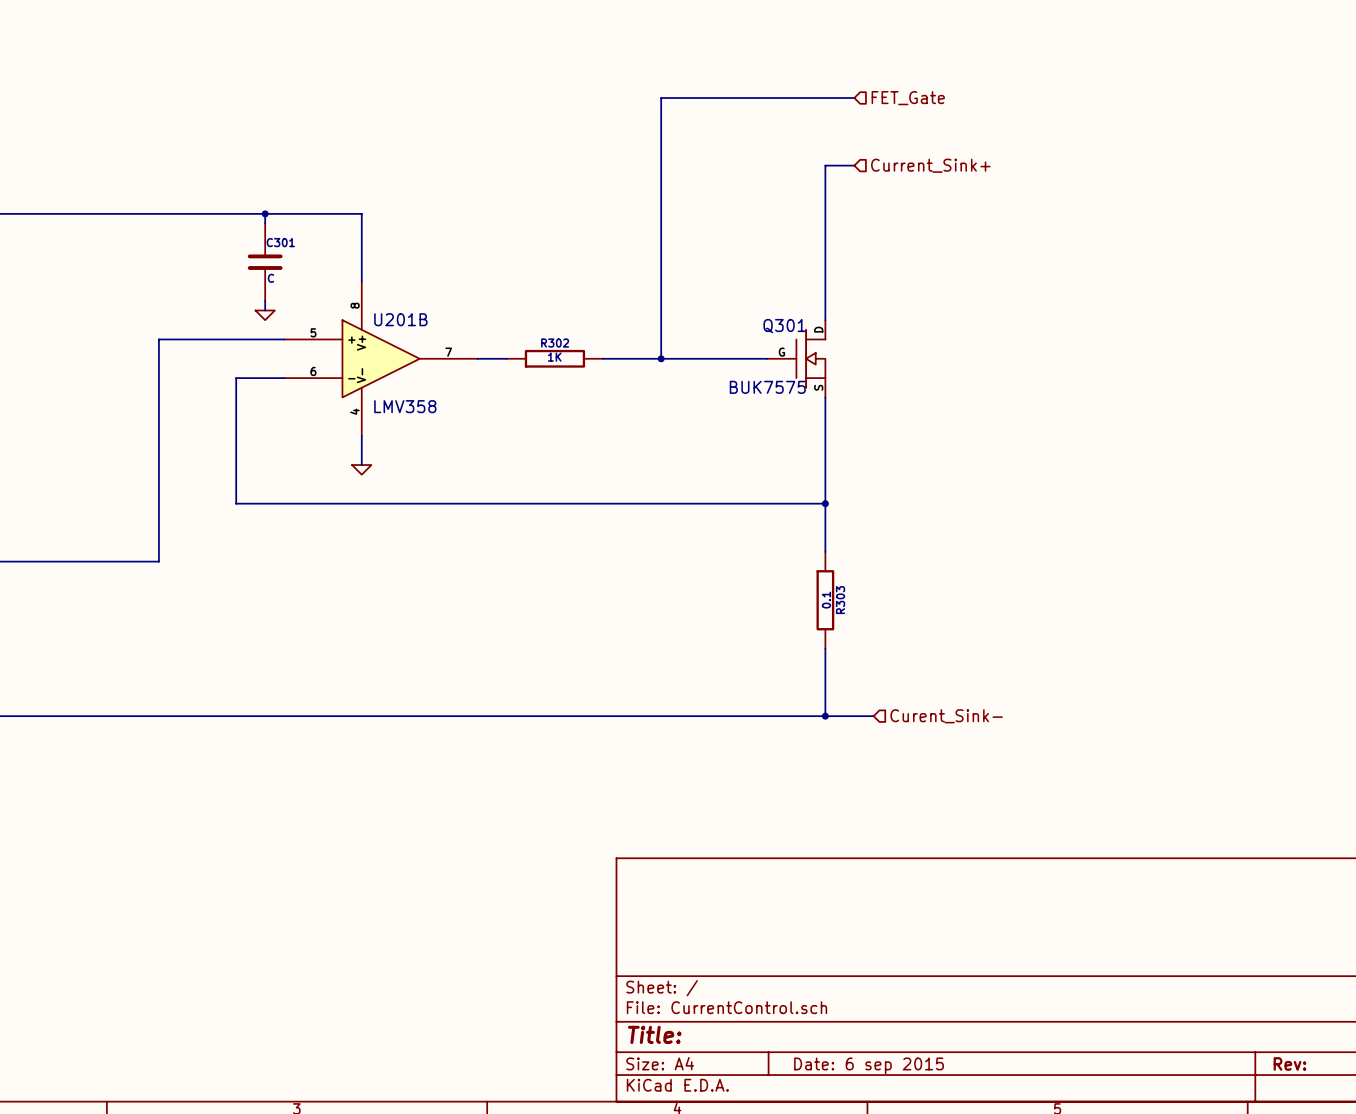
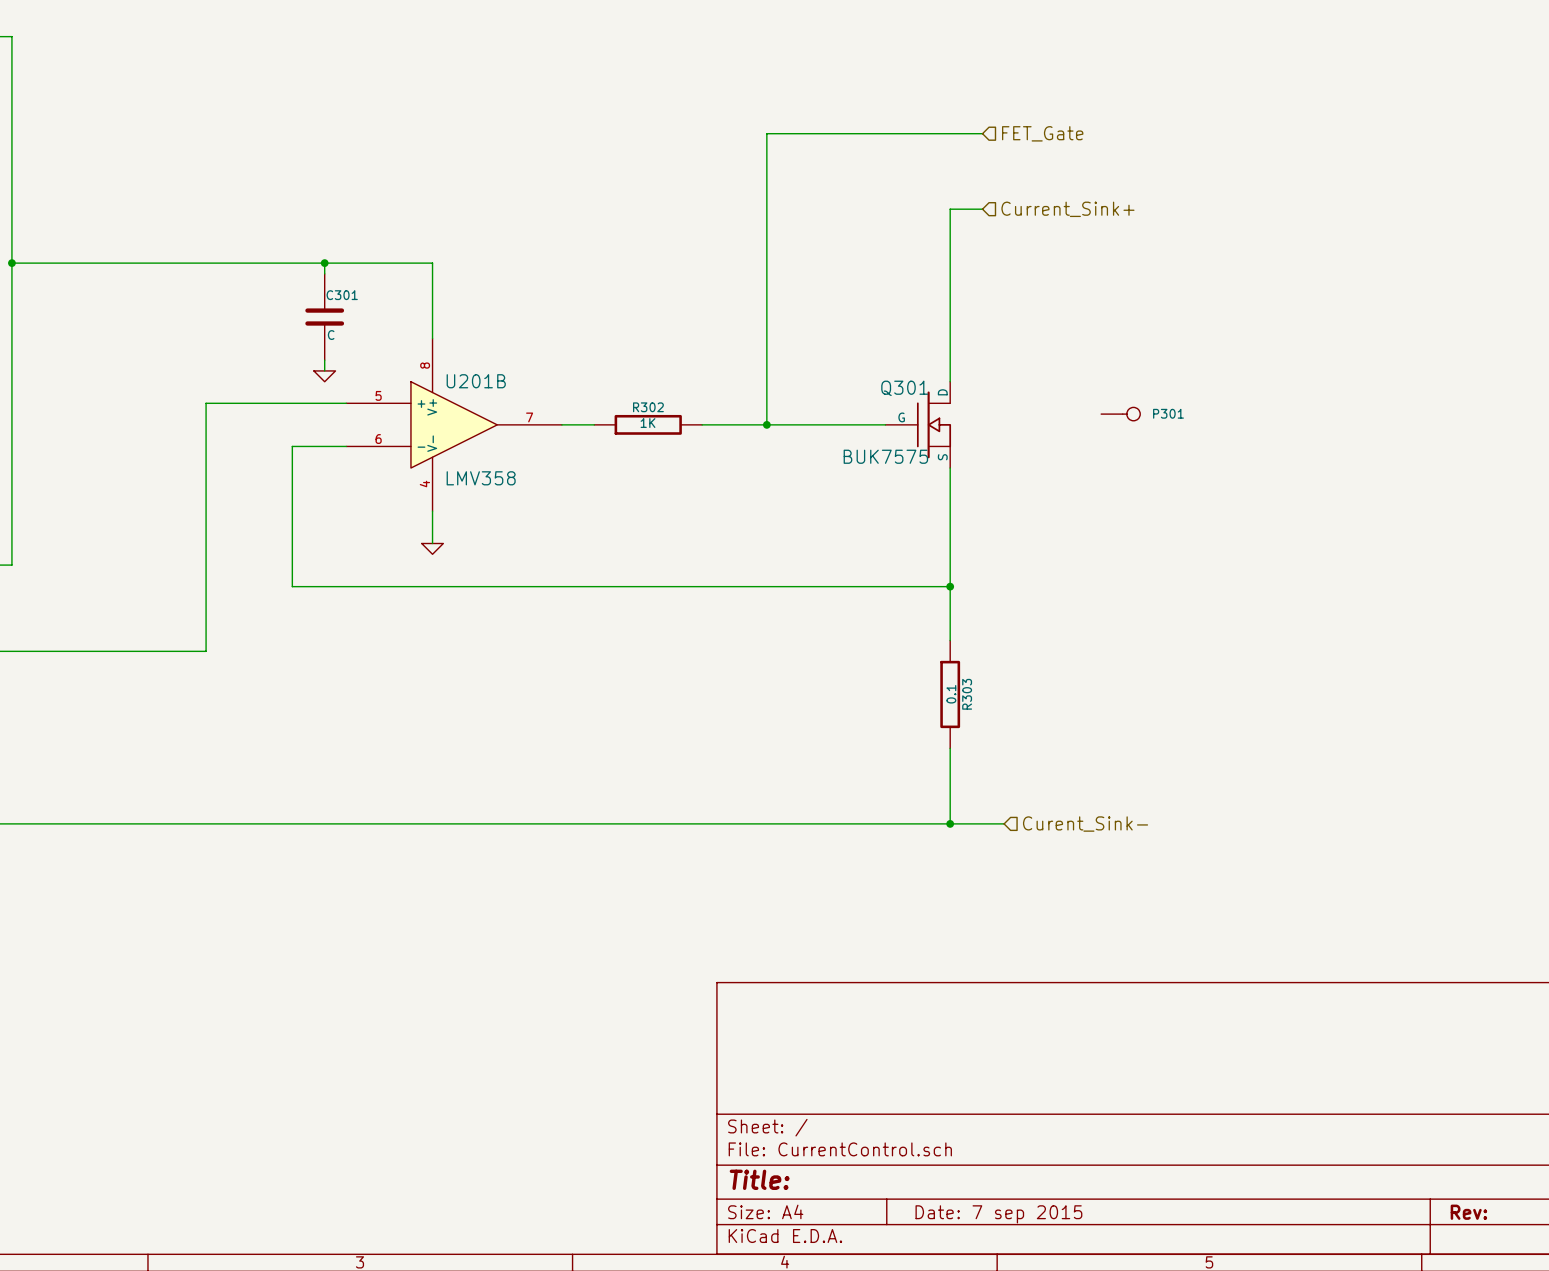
P301: none -> (1120, 414)
title block: Date: 6 sep 2015 (869, 1065) -> Date: 7 sep 2015 (998, 1214)

